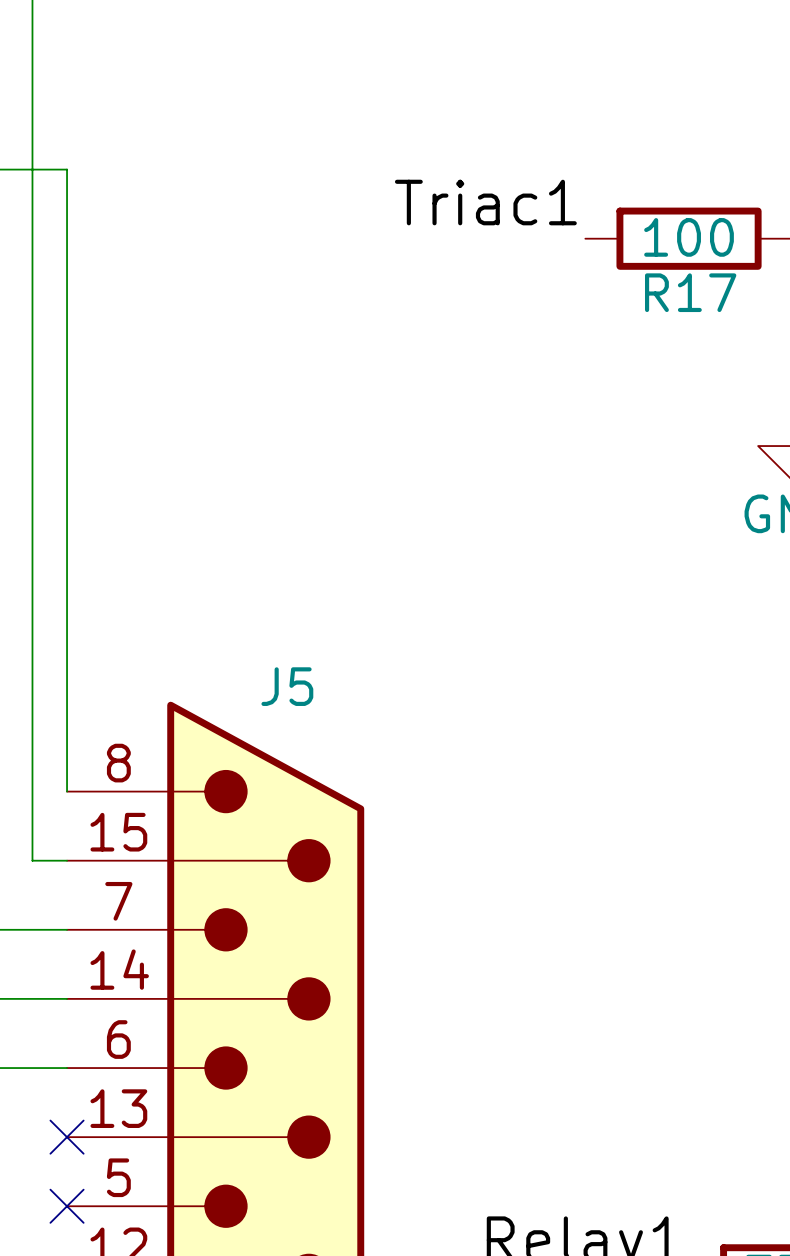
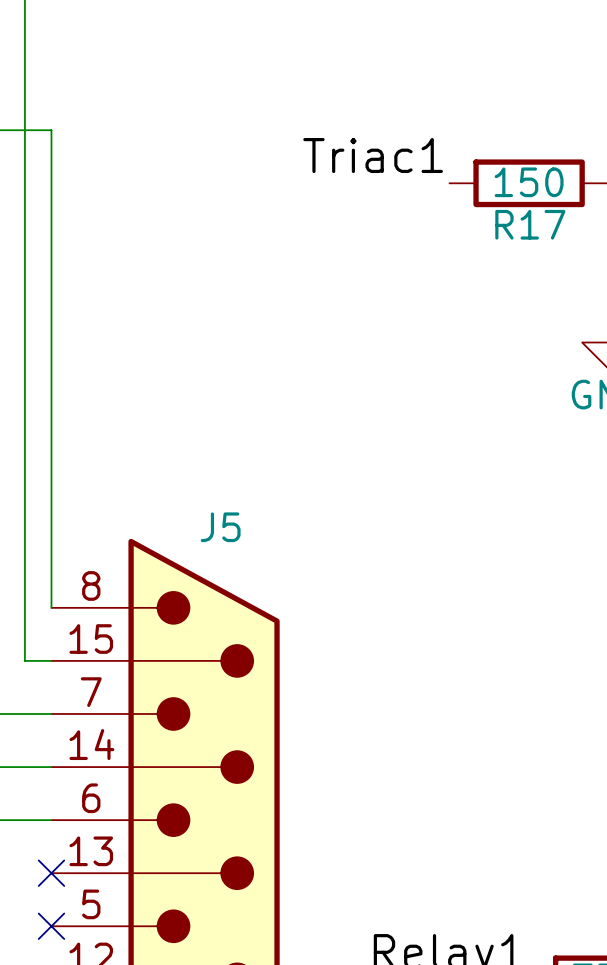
R17 value: 100 (689, 237) -> 150 (529, 182)

